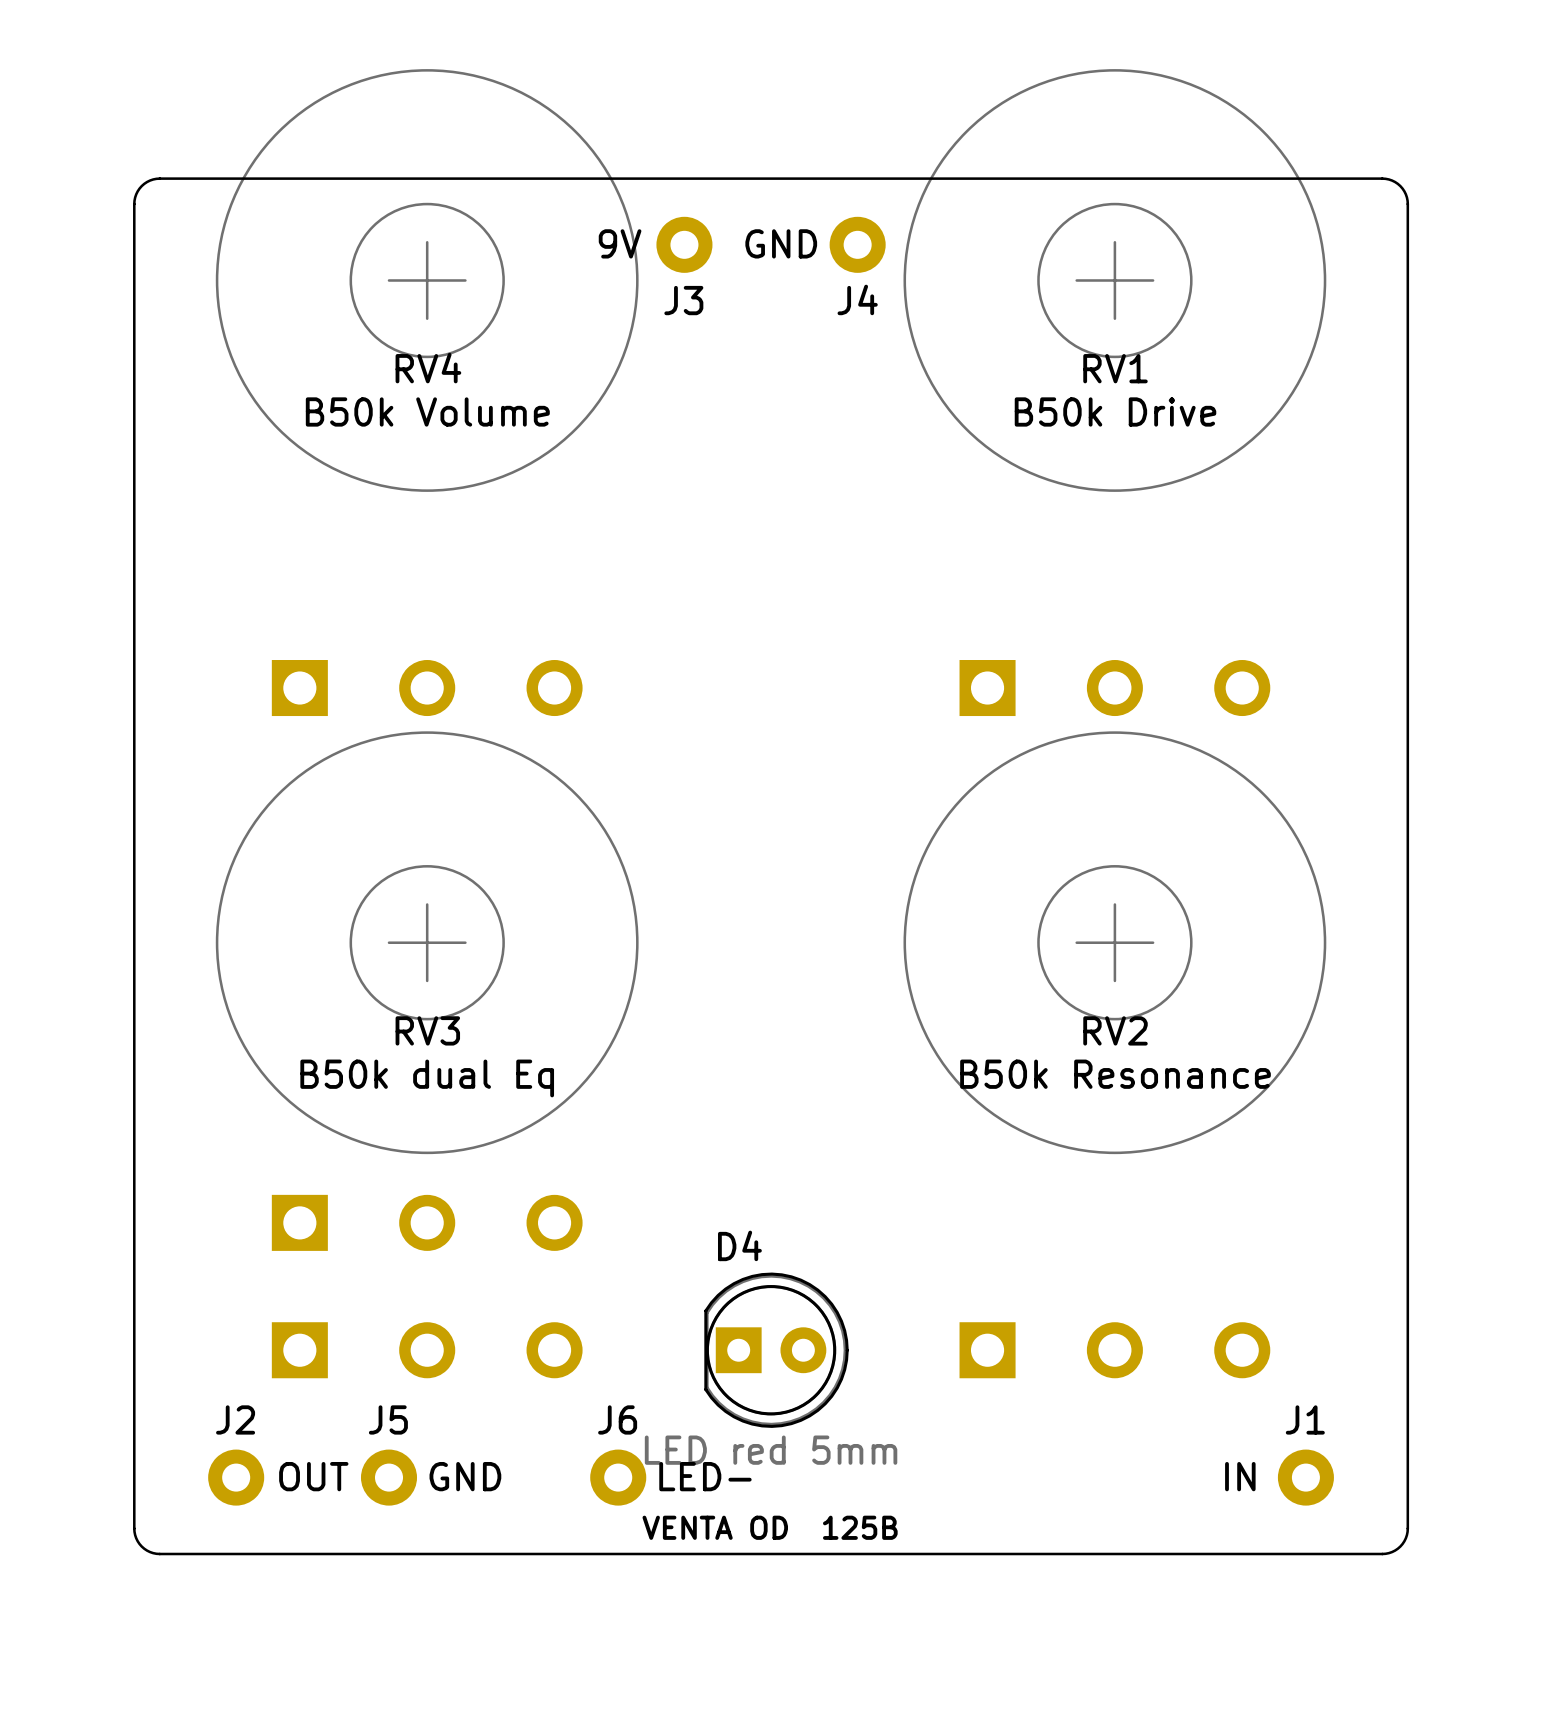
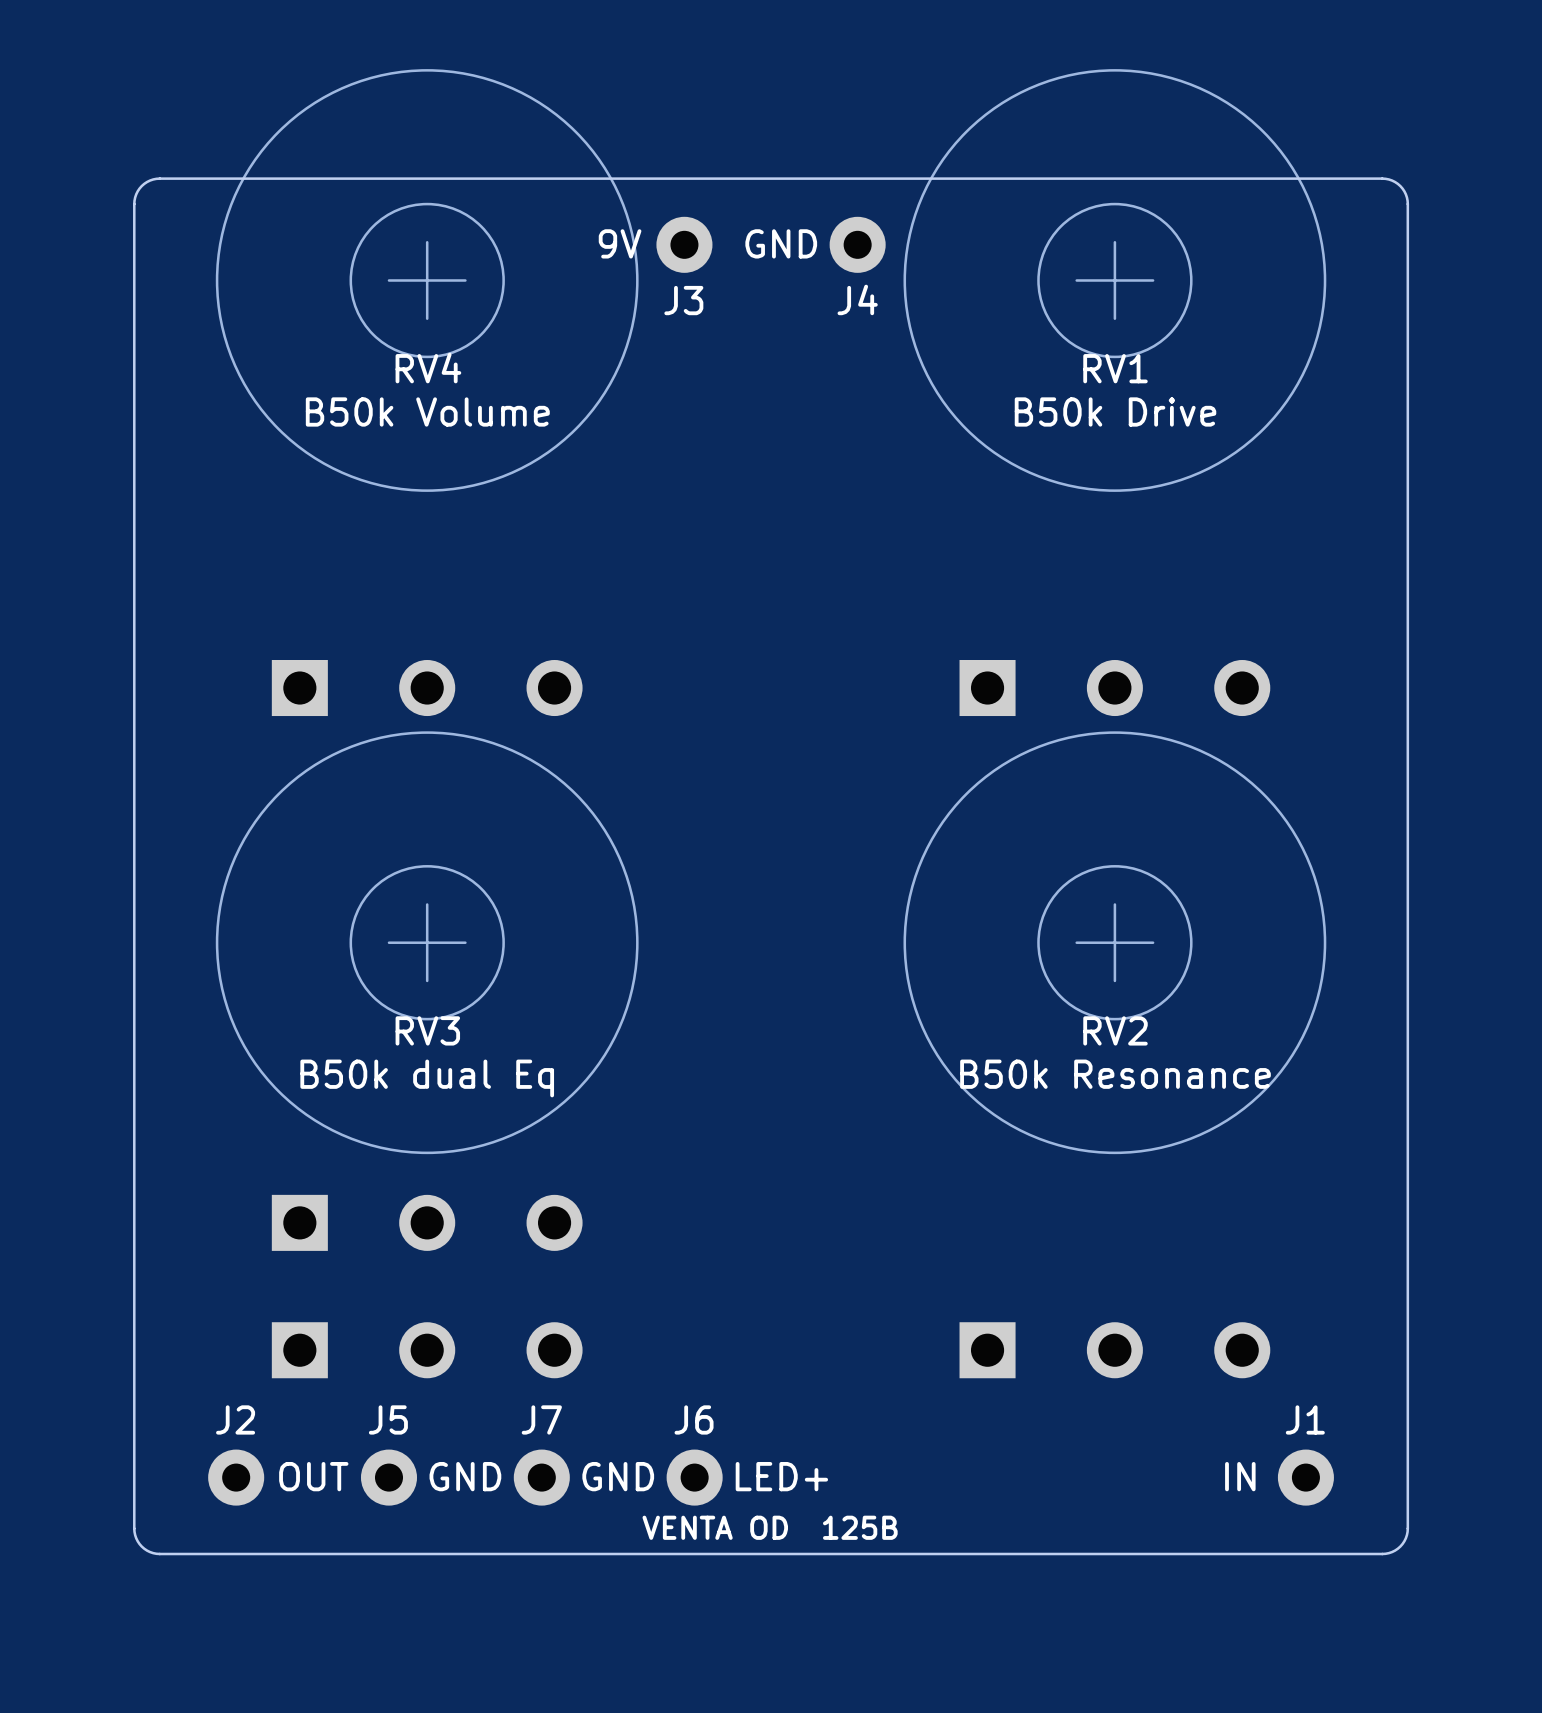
D4: LED red 5mm (776, 1350) -> none
J6 value: LED- (705, 1476) -> LED+ (781, 1476)
J7: none -> GND (541, 1477)
J6 position: (618, 1477) -> (694, 1477)

